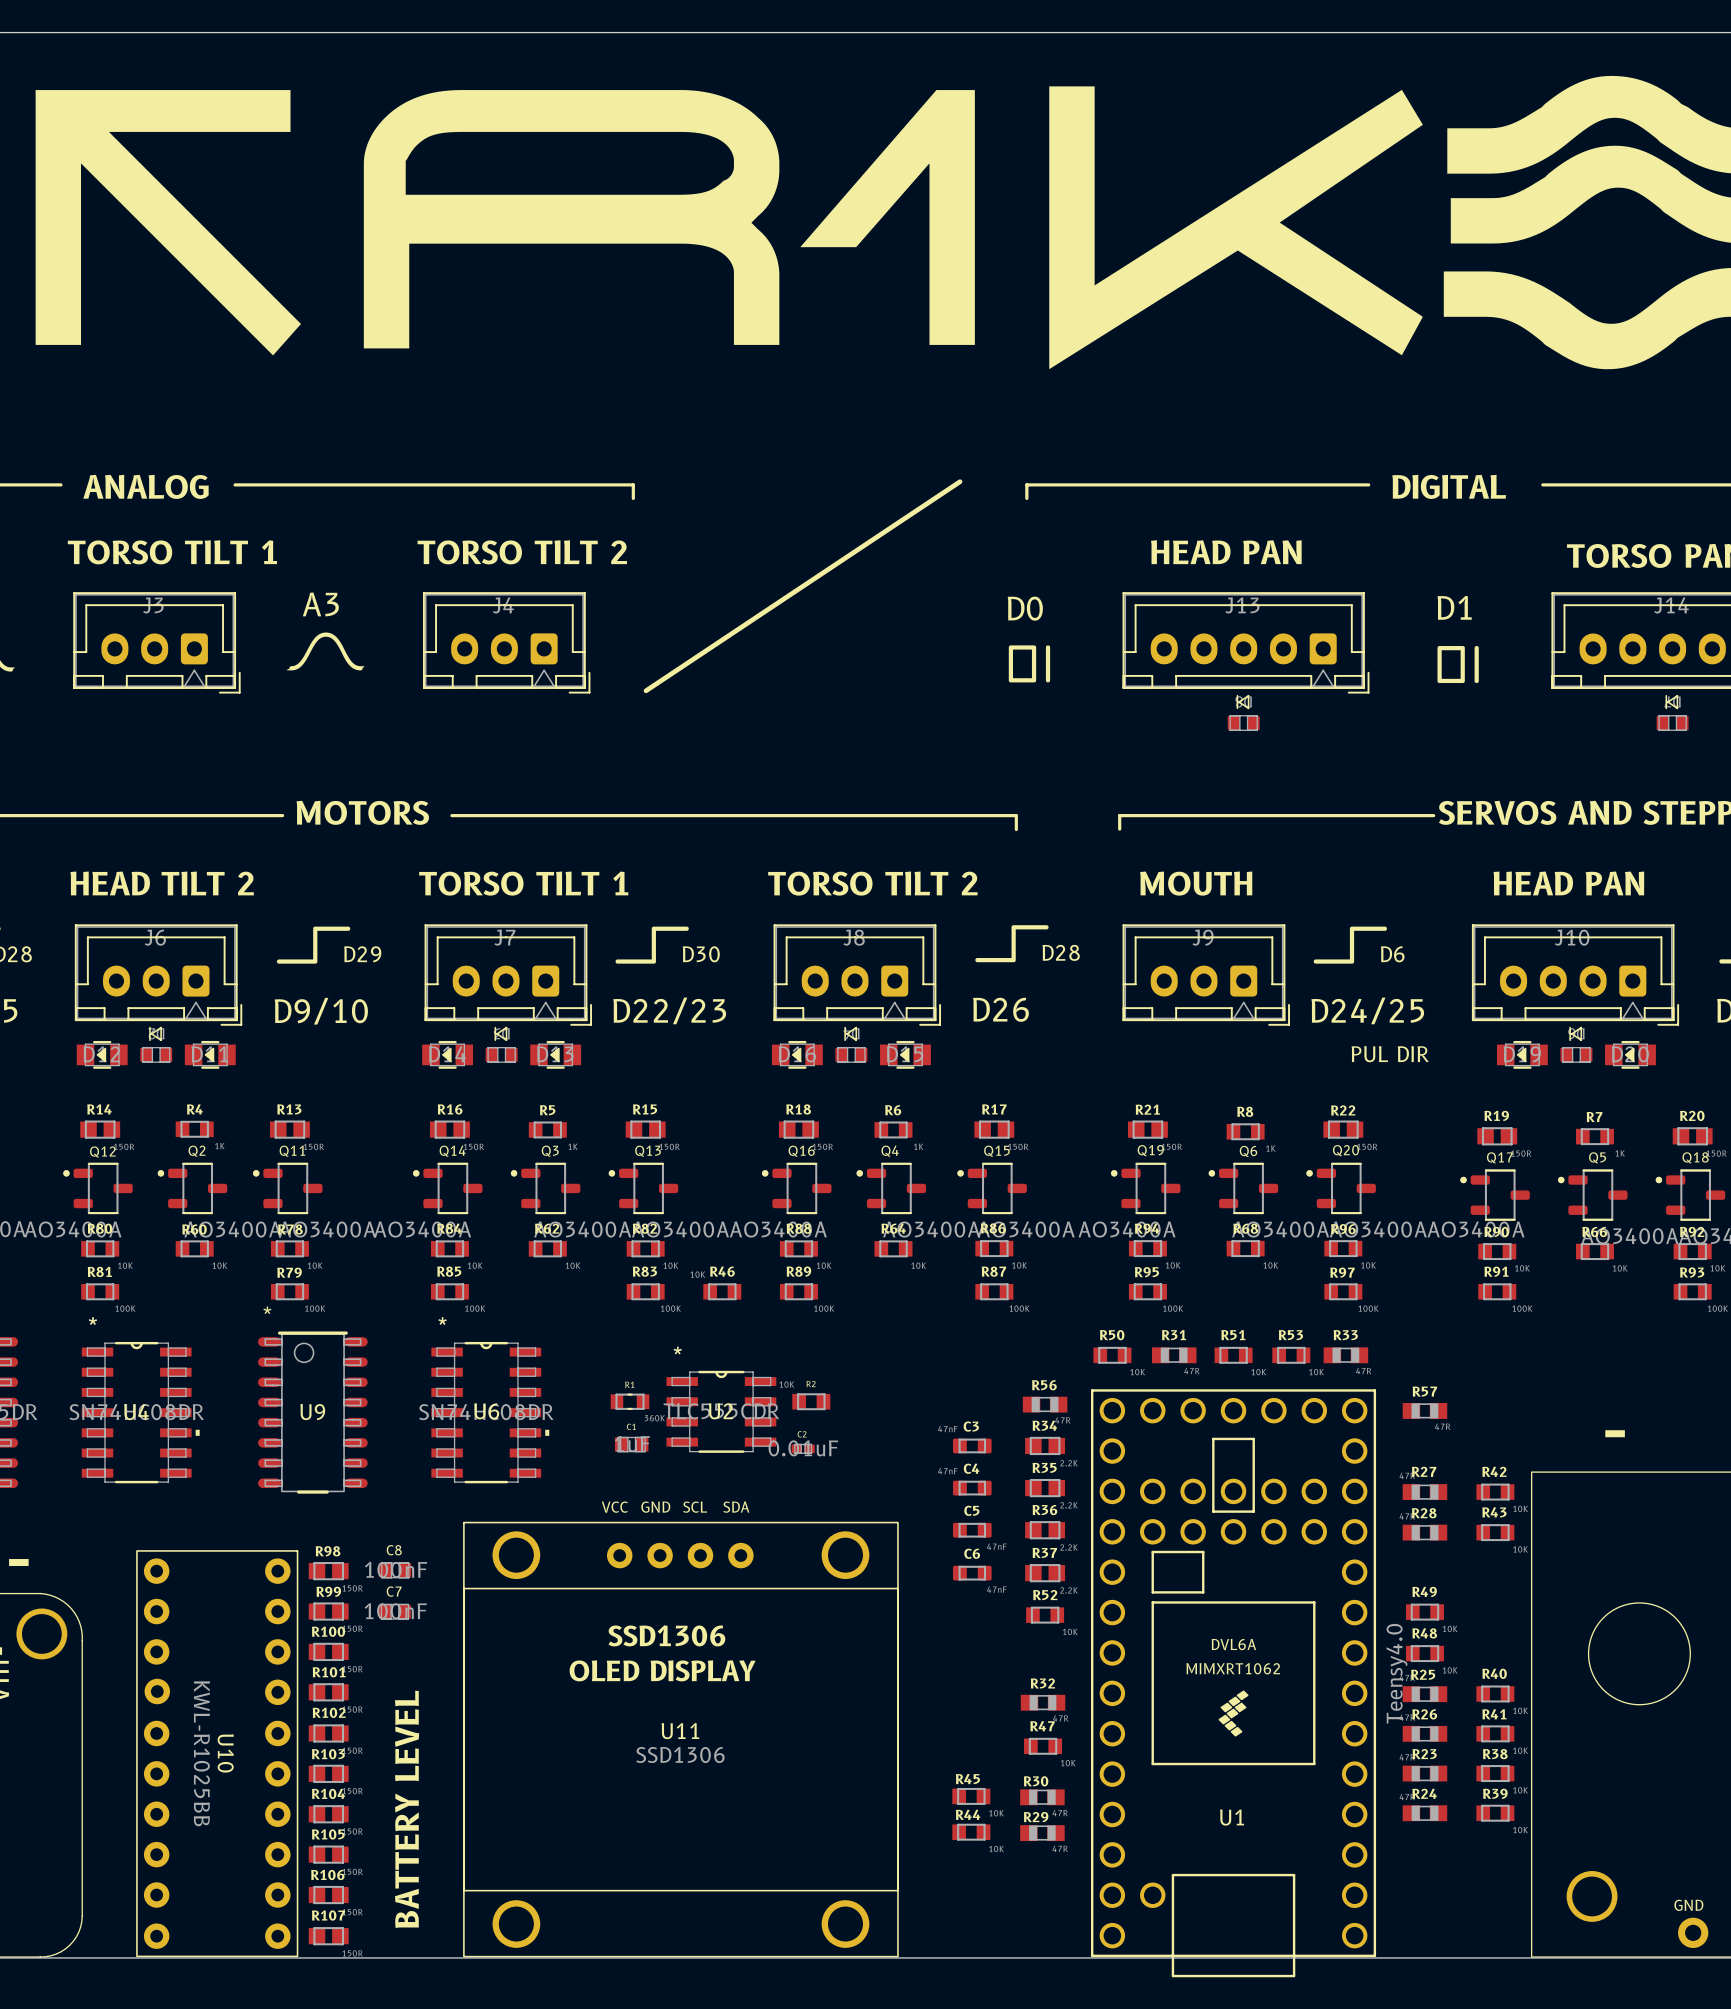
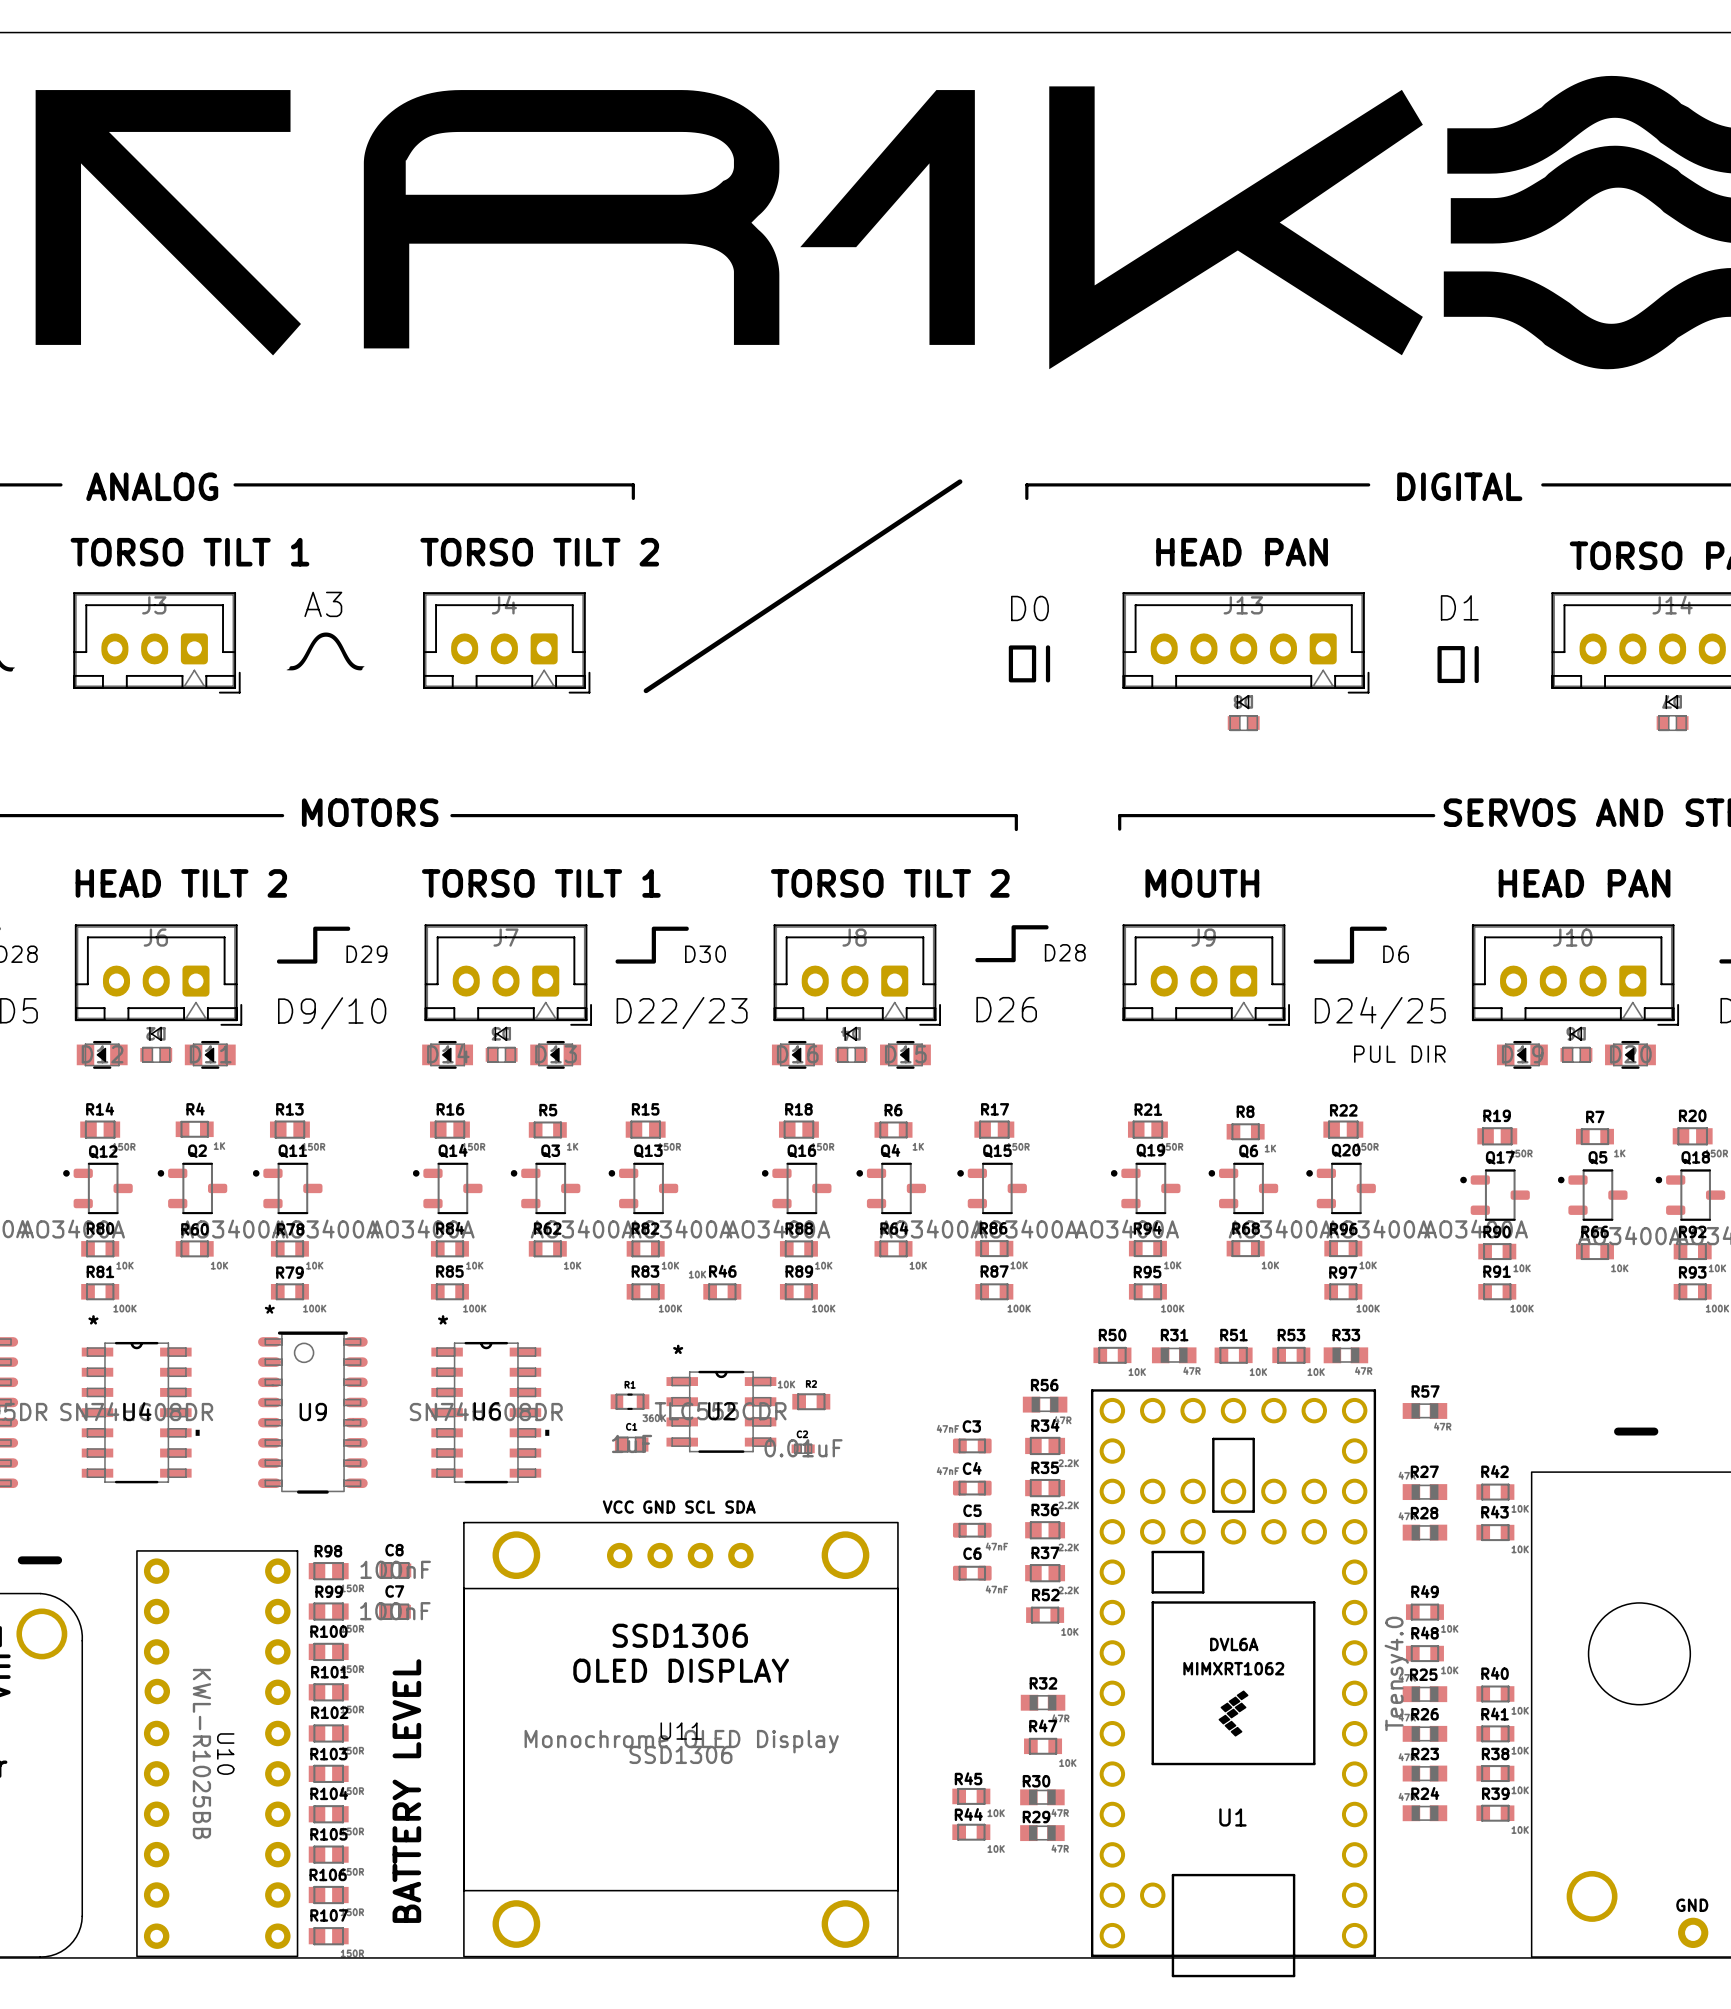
U11 text: none -> Monochrome OLED Display (681, 1741)

